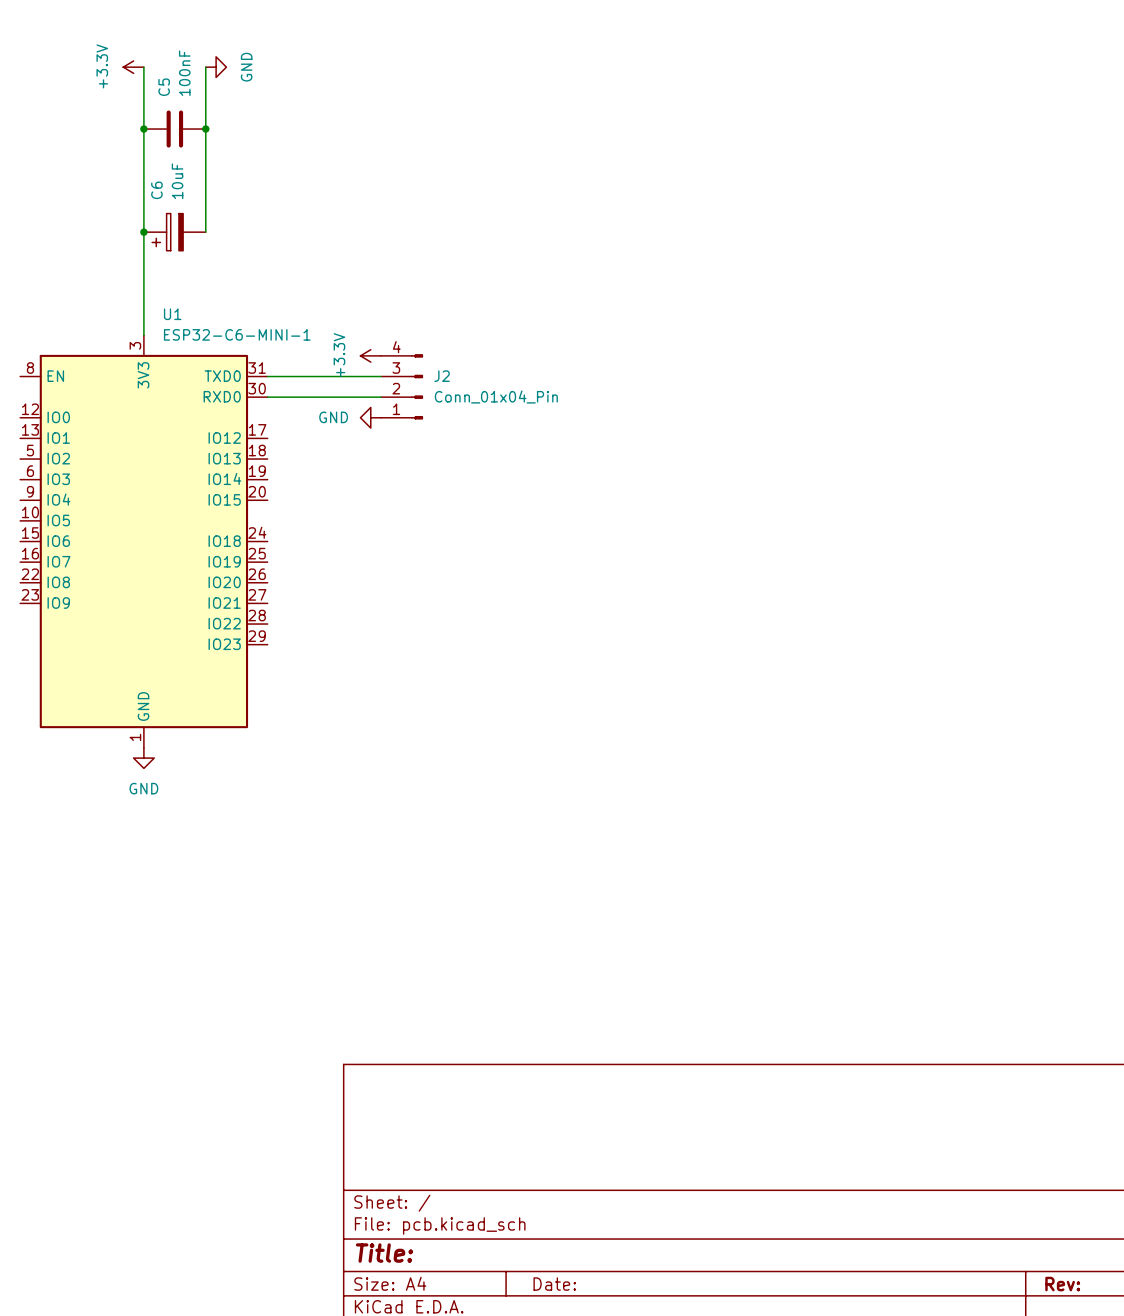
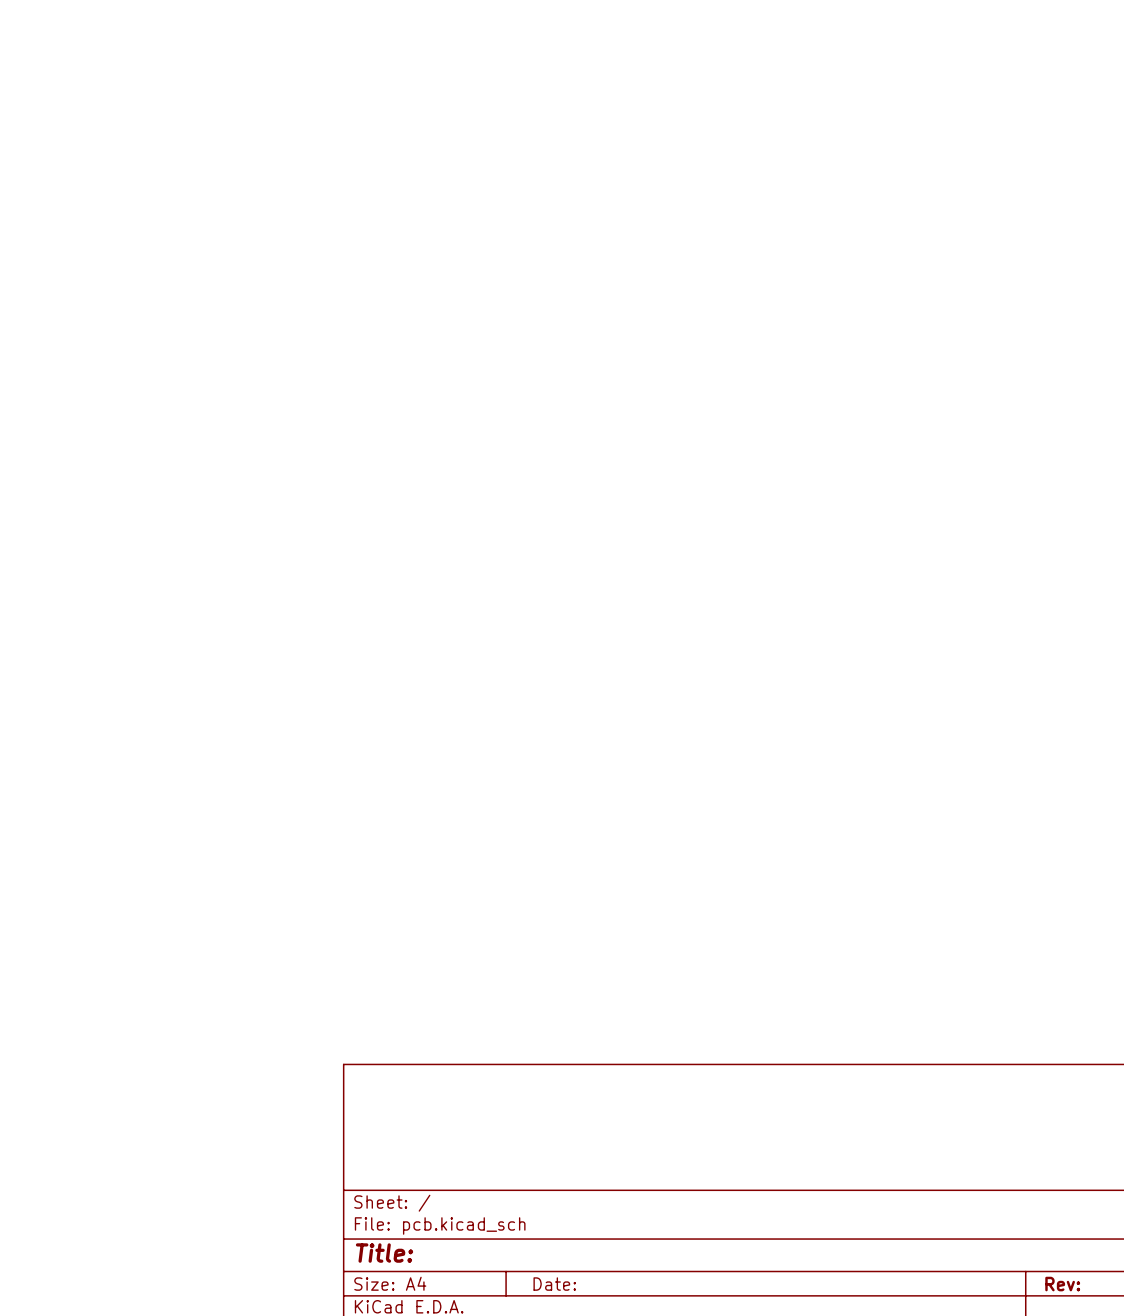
power symbol: +3.3V (133, 67) -> none
wire: (143, 67) (143, 335) -> none
wire: (205, 67) (205, 232) -> none
power symbol: GND (216, 67) -> none
junction: (143, 129) -> none
C5: 100nF (174, 129) -> none
junction: (205, 129) -> none
junction: (143, 232) -> none
C6: 10uF (174, 232) -> none
power symbol: +3.3V (370, 355) -> none
wire: (267, 376) (381, 376) -> none
J2: Conn_01x04_Pin (402, 386) -> none
wire: (267, 397) (381, 397) -> none
power symbol: GND (370, 417) -> none
U1: ESP32-C6-MINI-1 (143, 541) -> none
power symbol: GND (143, 758) -> none

